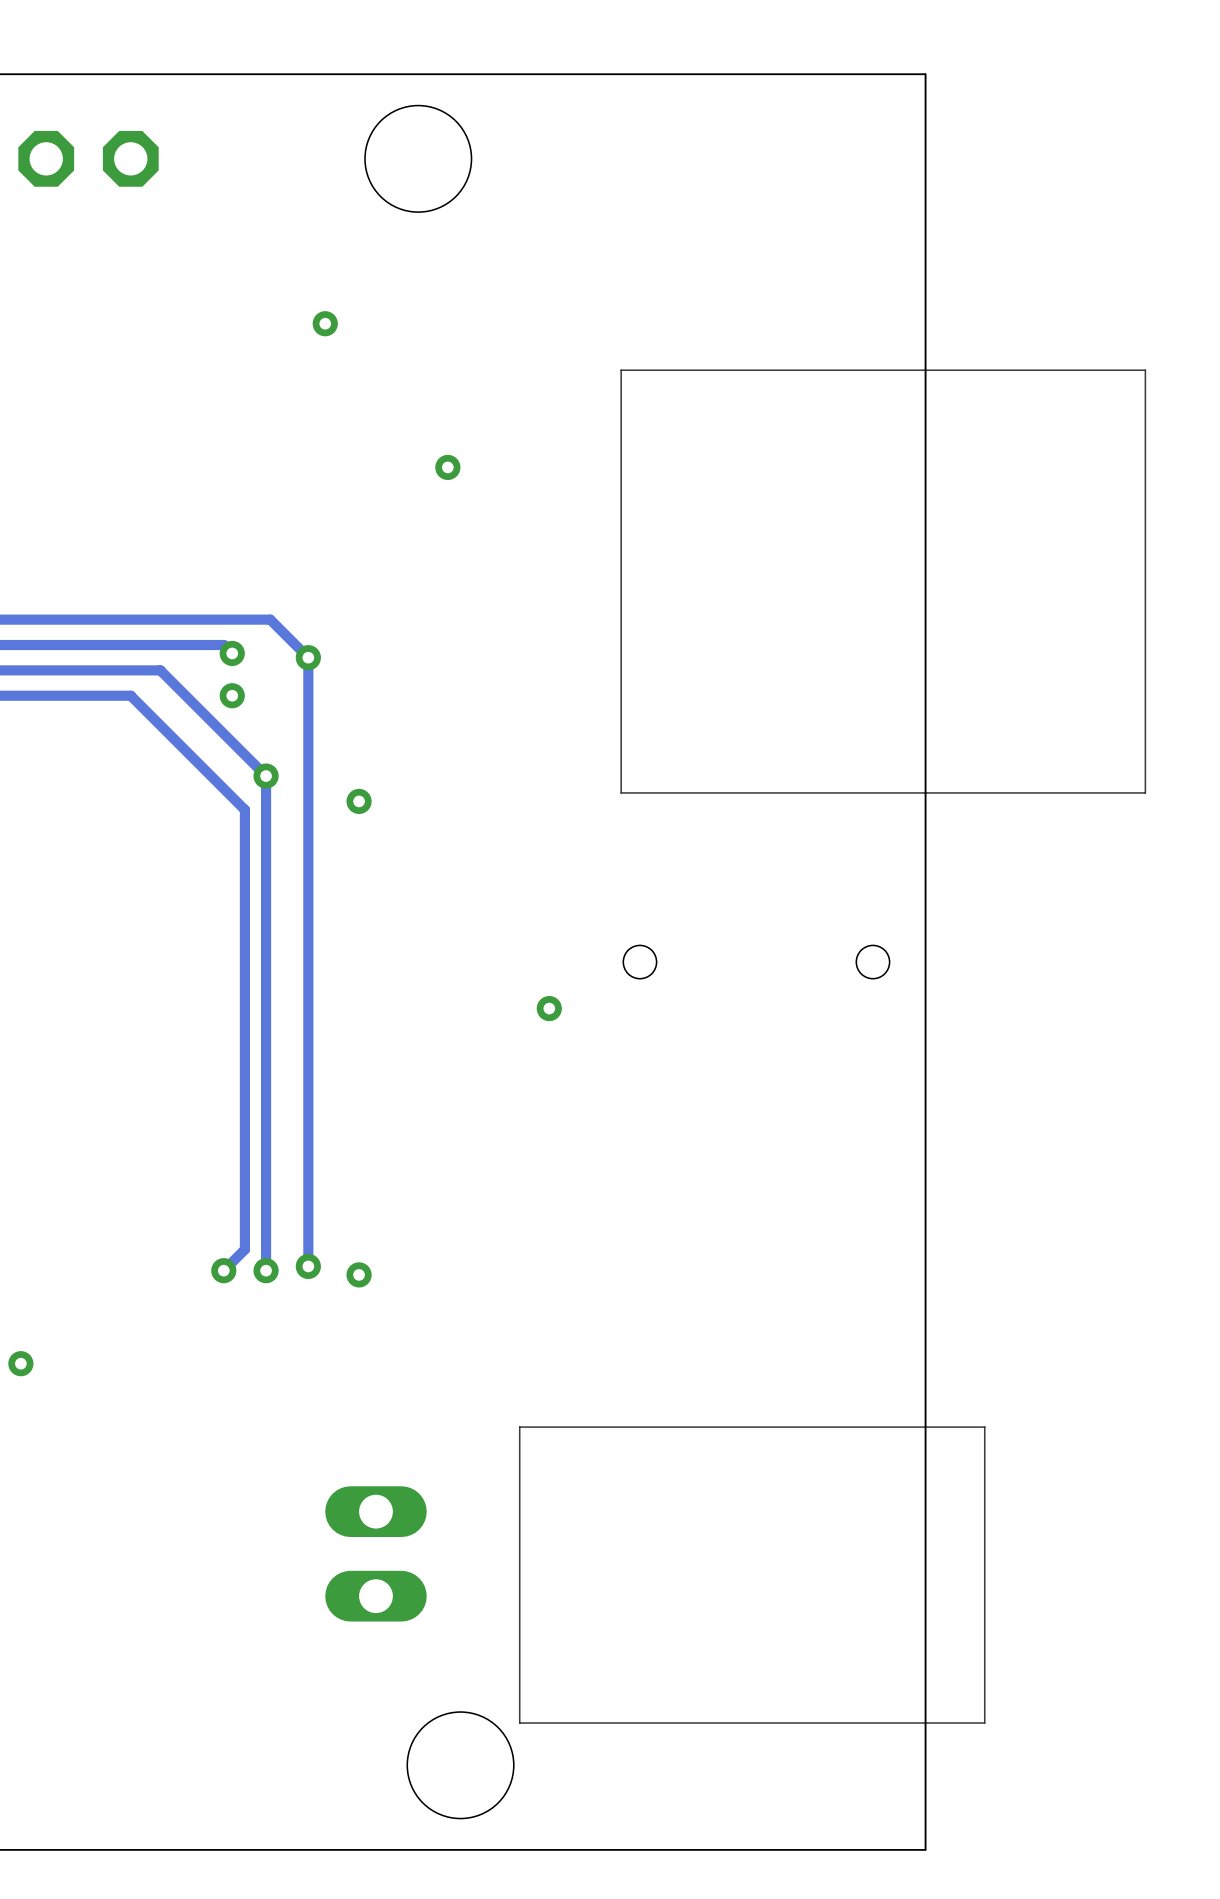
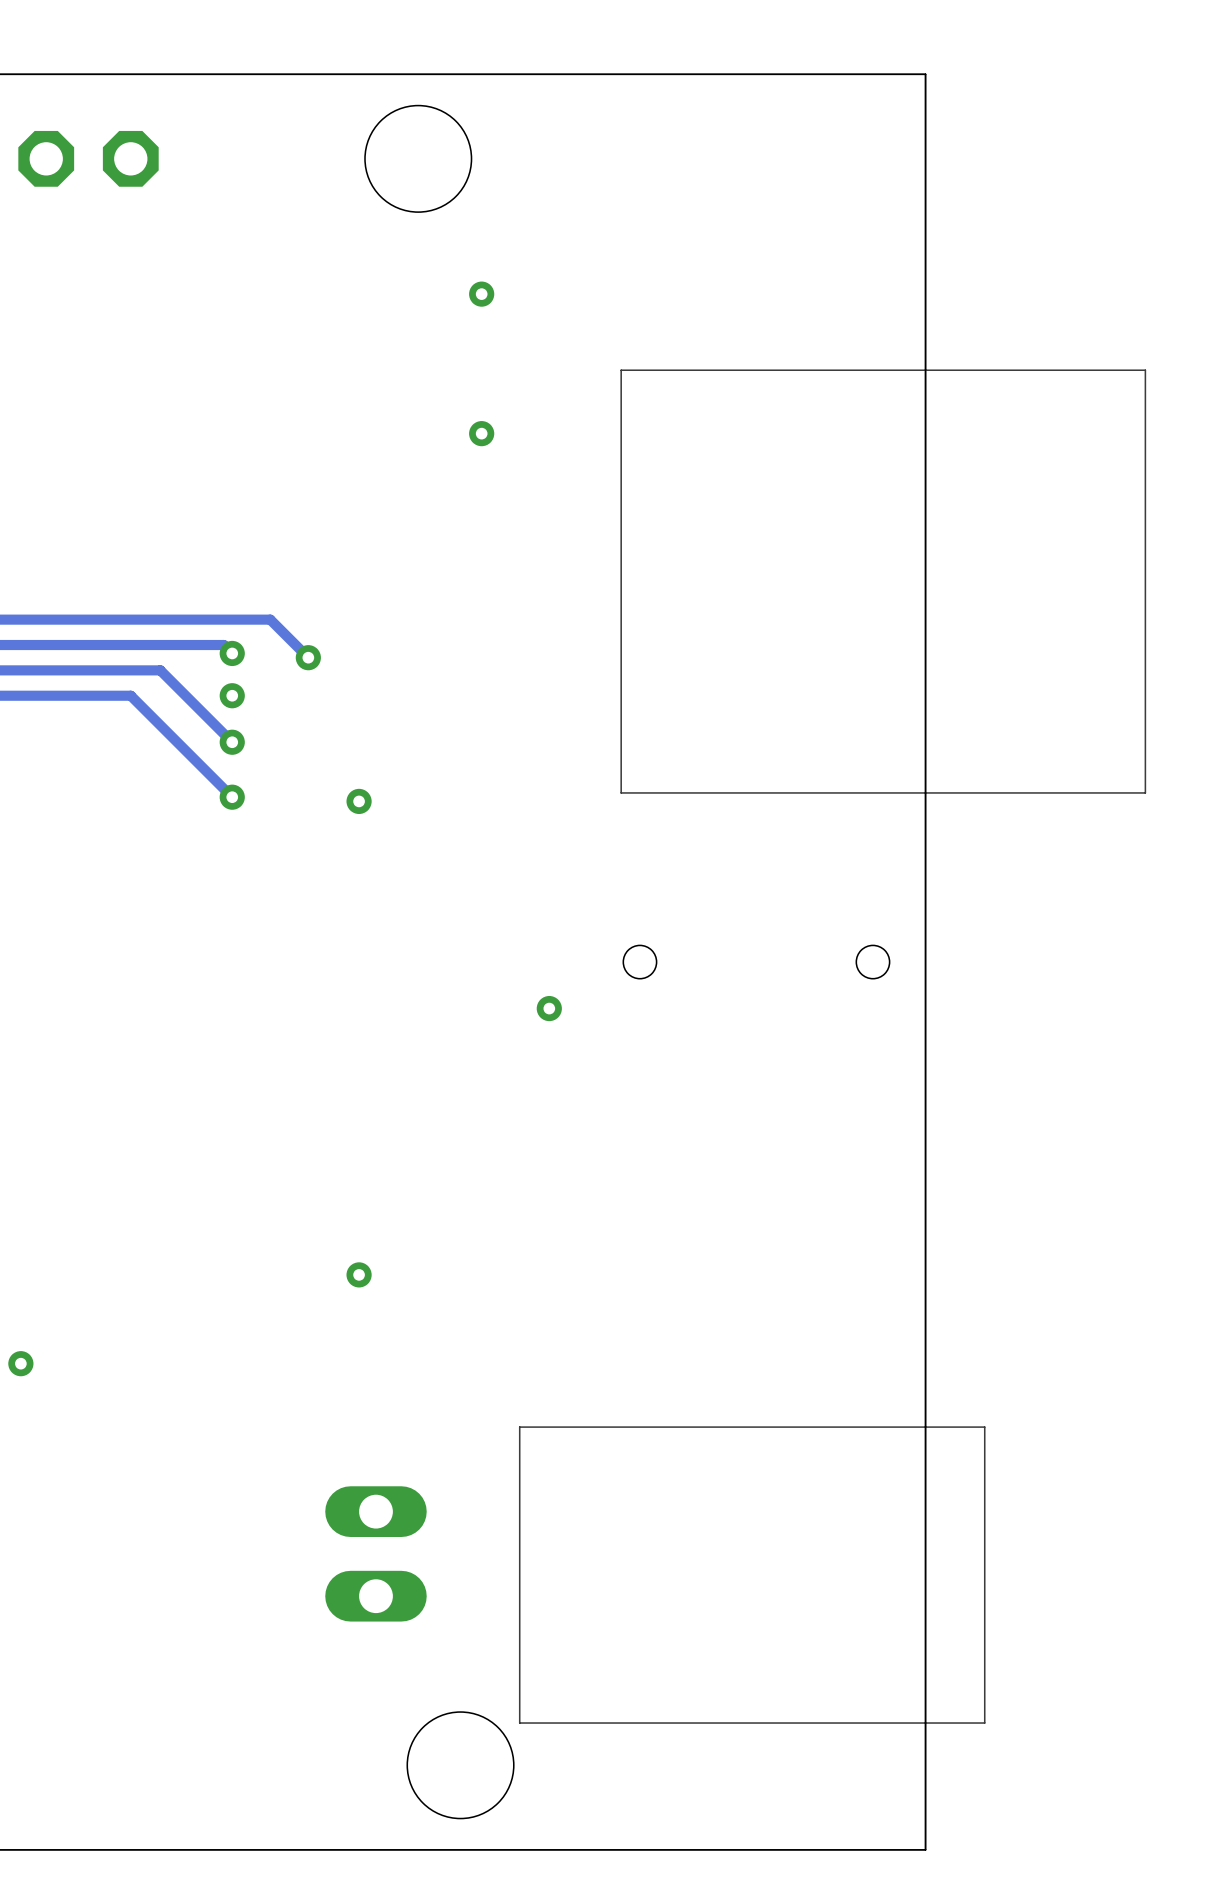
via: none -> (481, 294)
via: (325, 323) -> none
via position: (447, 467) -> (481, 433)
track: (308, 657) (308, 1266) -> none
track: (232, 742) (266, 776) (266, 1270) -> none
via: none -> (232, 742)
via: (266, 776) -> none
track: (232, 797) (244, 809) (244, 1249) (223, 1270) -> none
via: none -> (232, 797)
via: (308, 1266) -> none
via: (223, 1270) -> none
via: (266, 1270) -> none

